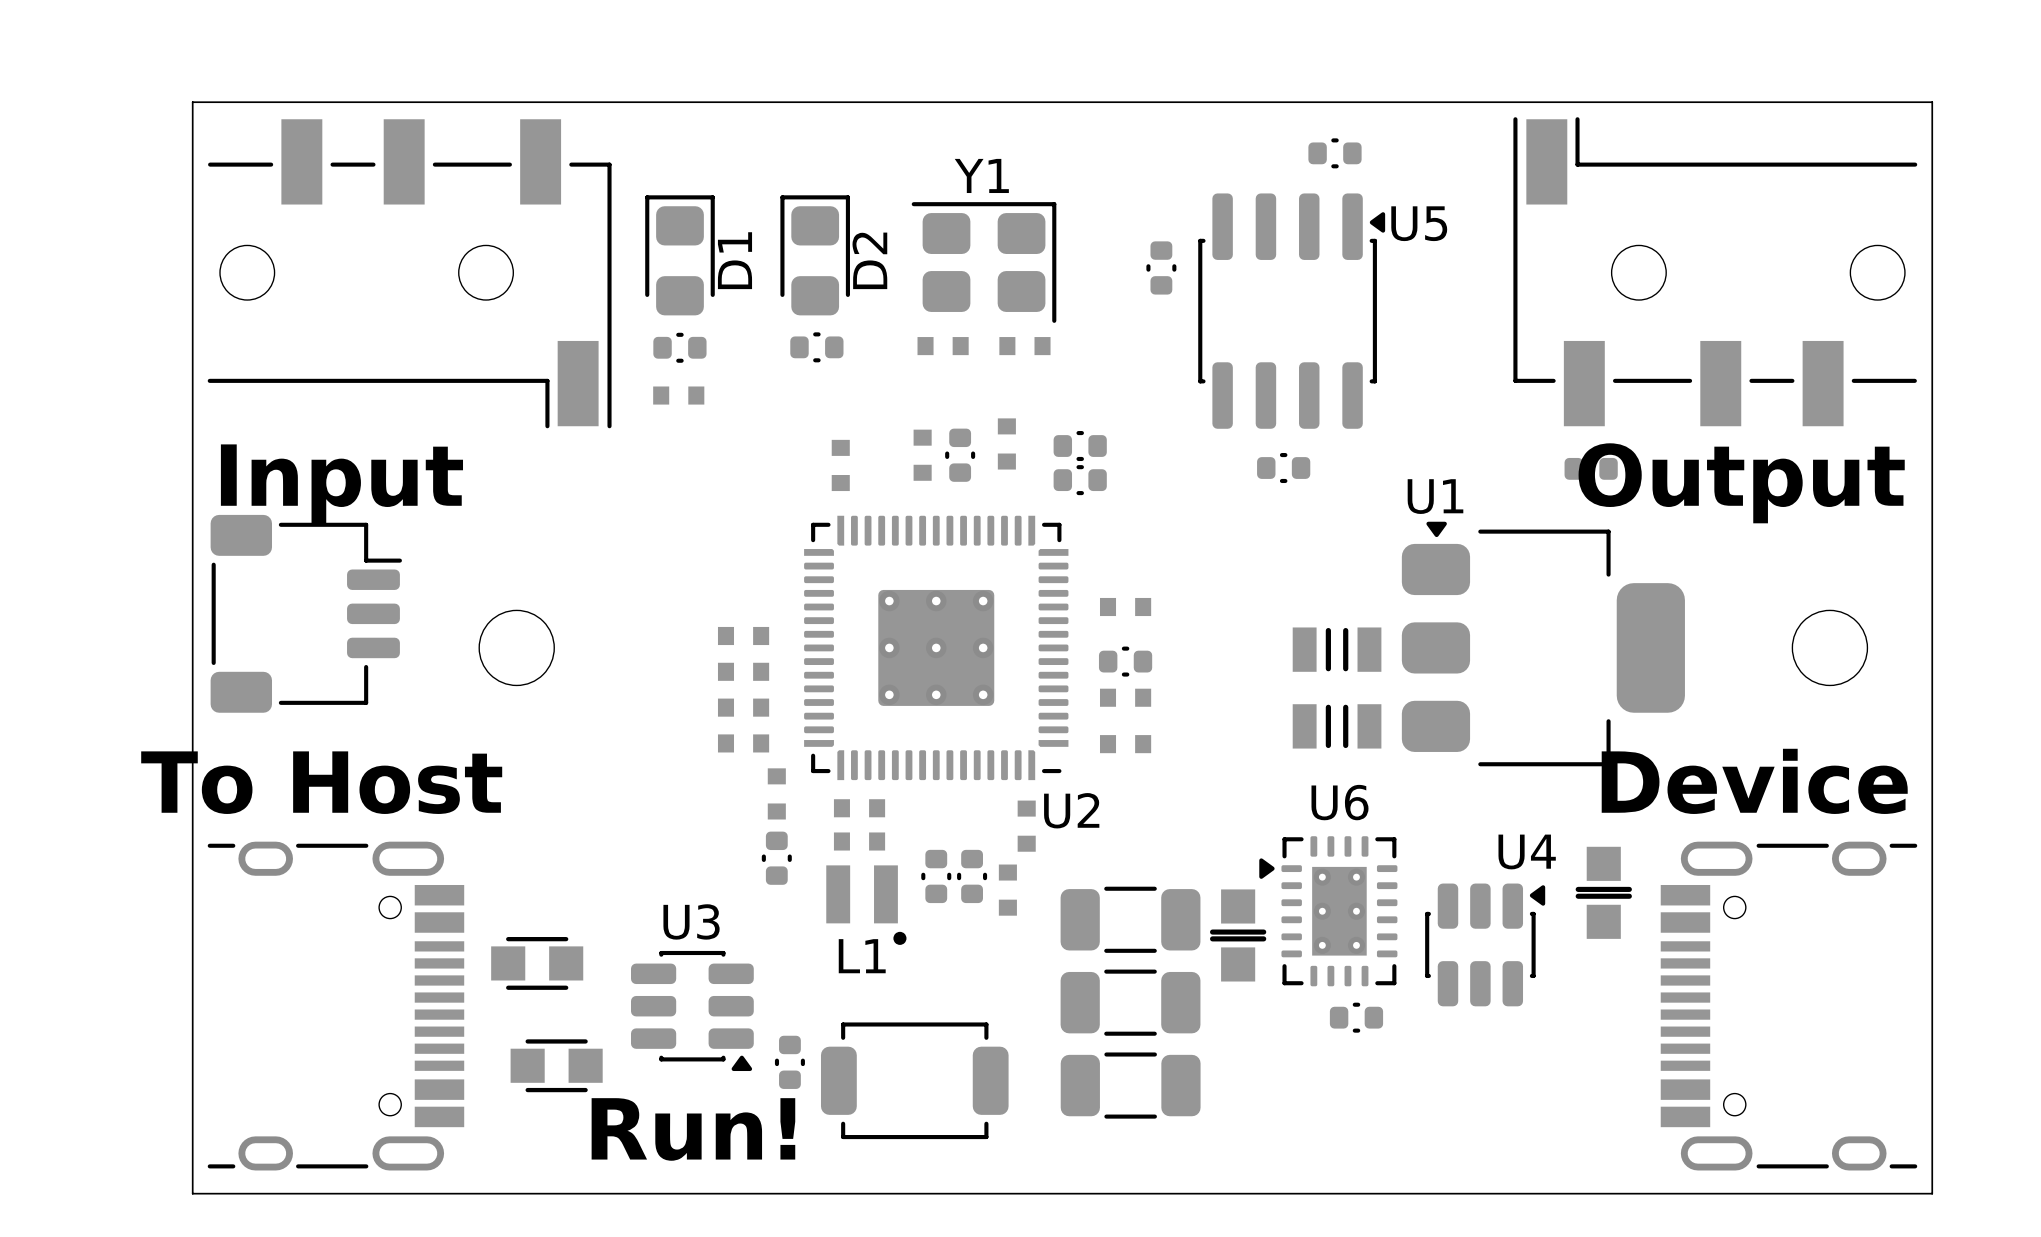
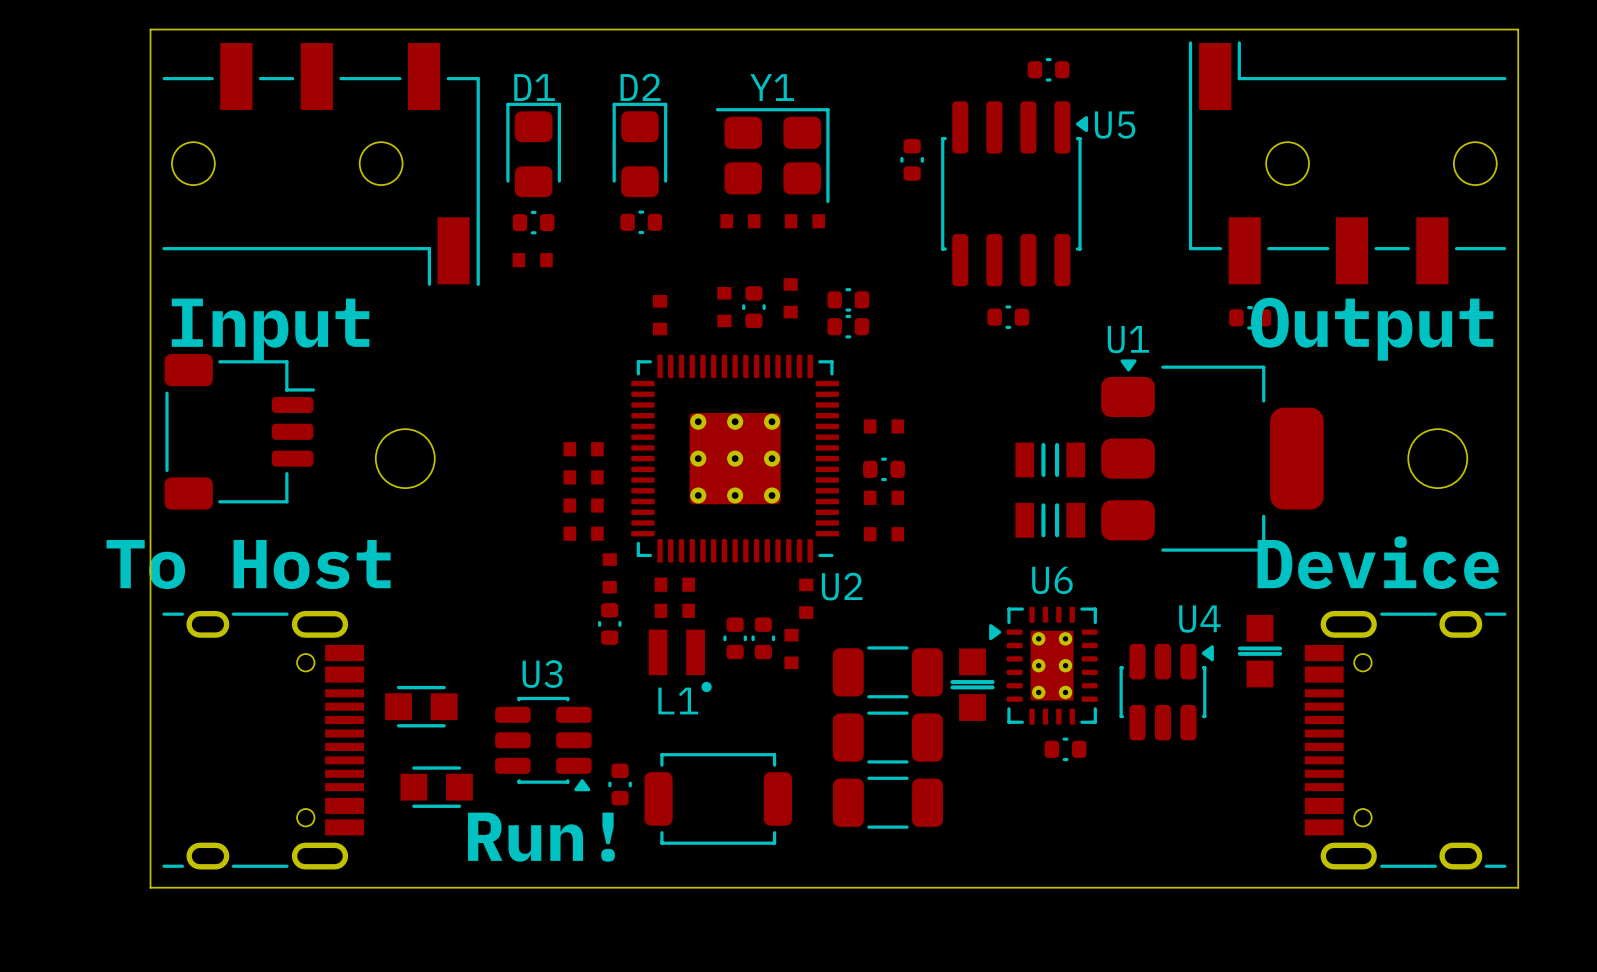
D1 name rotation: 0° (734, 260) -> 90° clockwise (534, 87)
D1 name position: D1 (734, 260) -> D1 (534, 87)
D2 name rotation: 0° (869, 260) -> 90° clockwise (640, 87)
D2 name position: D2 (869, 260) -> D2 (640, 87)

